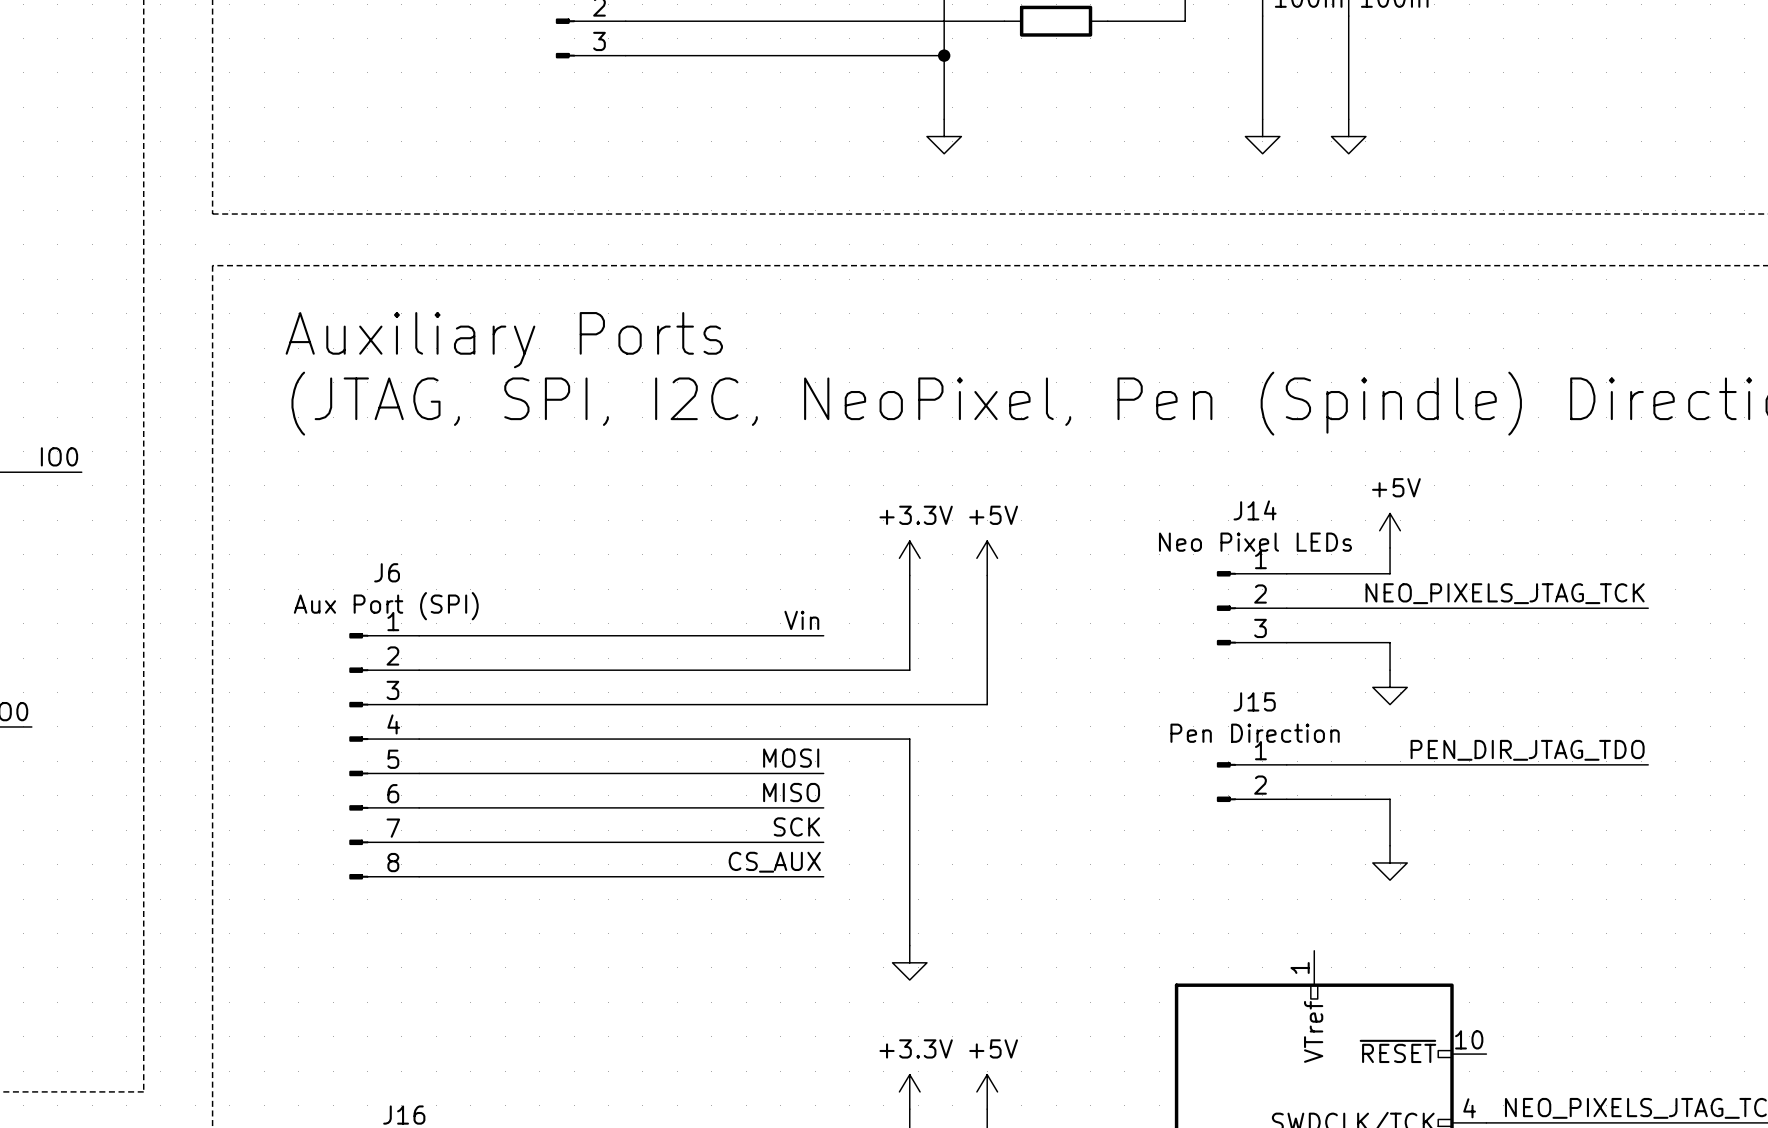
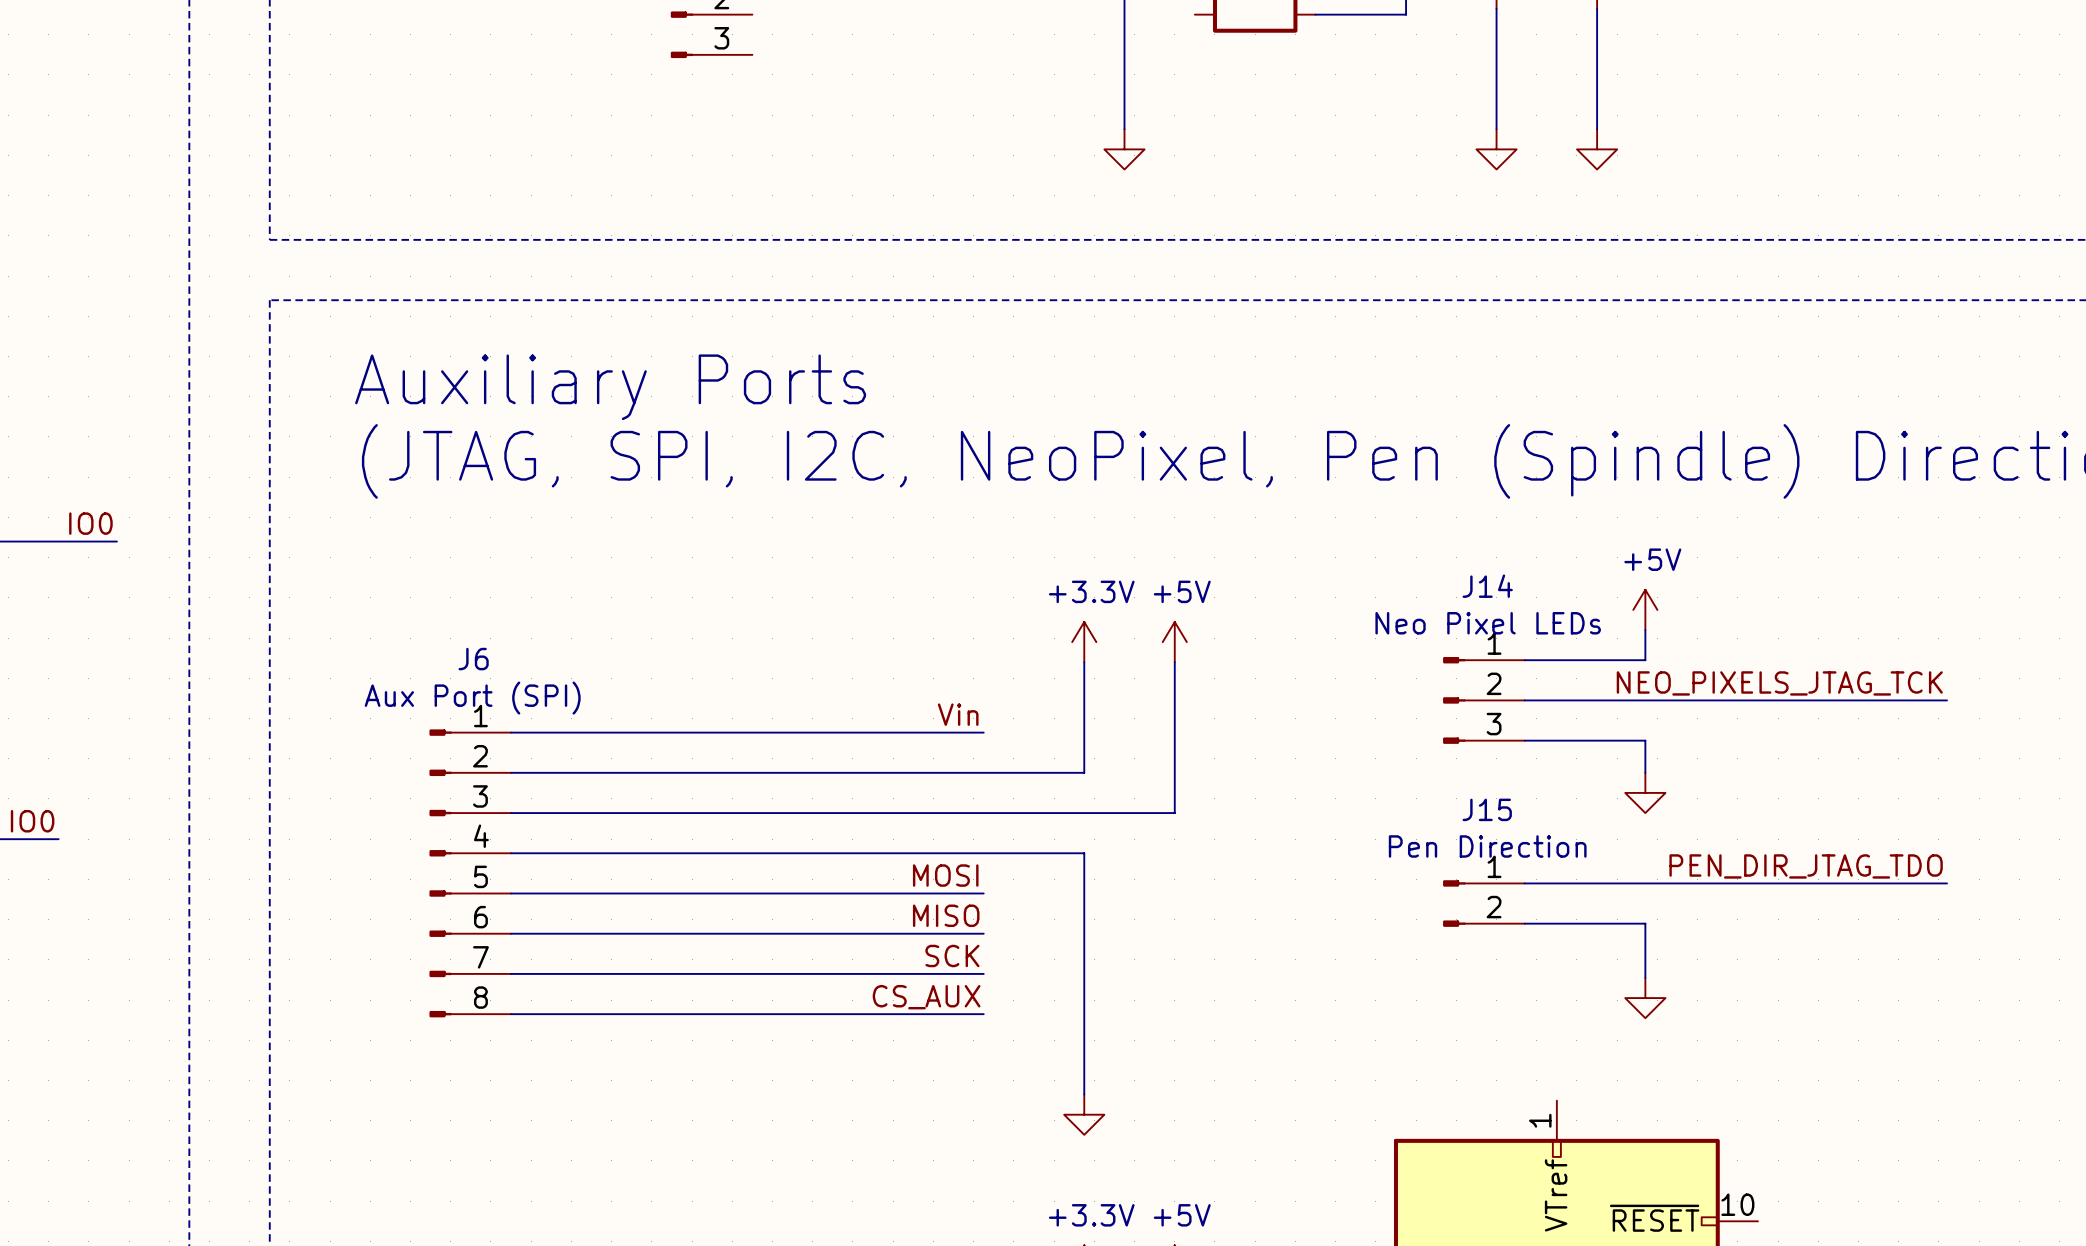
wire: (625, 21) (1004, 21) -> none
wire: (625, 55) (944, 55) -> none
junction: (944, 55) -> none

